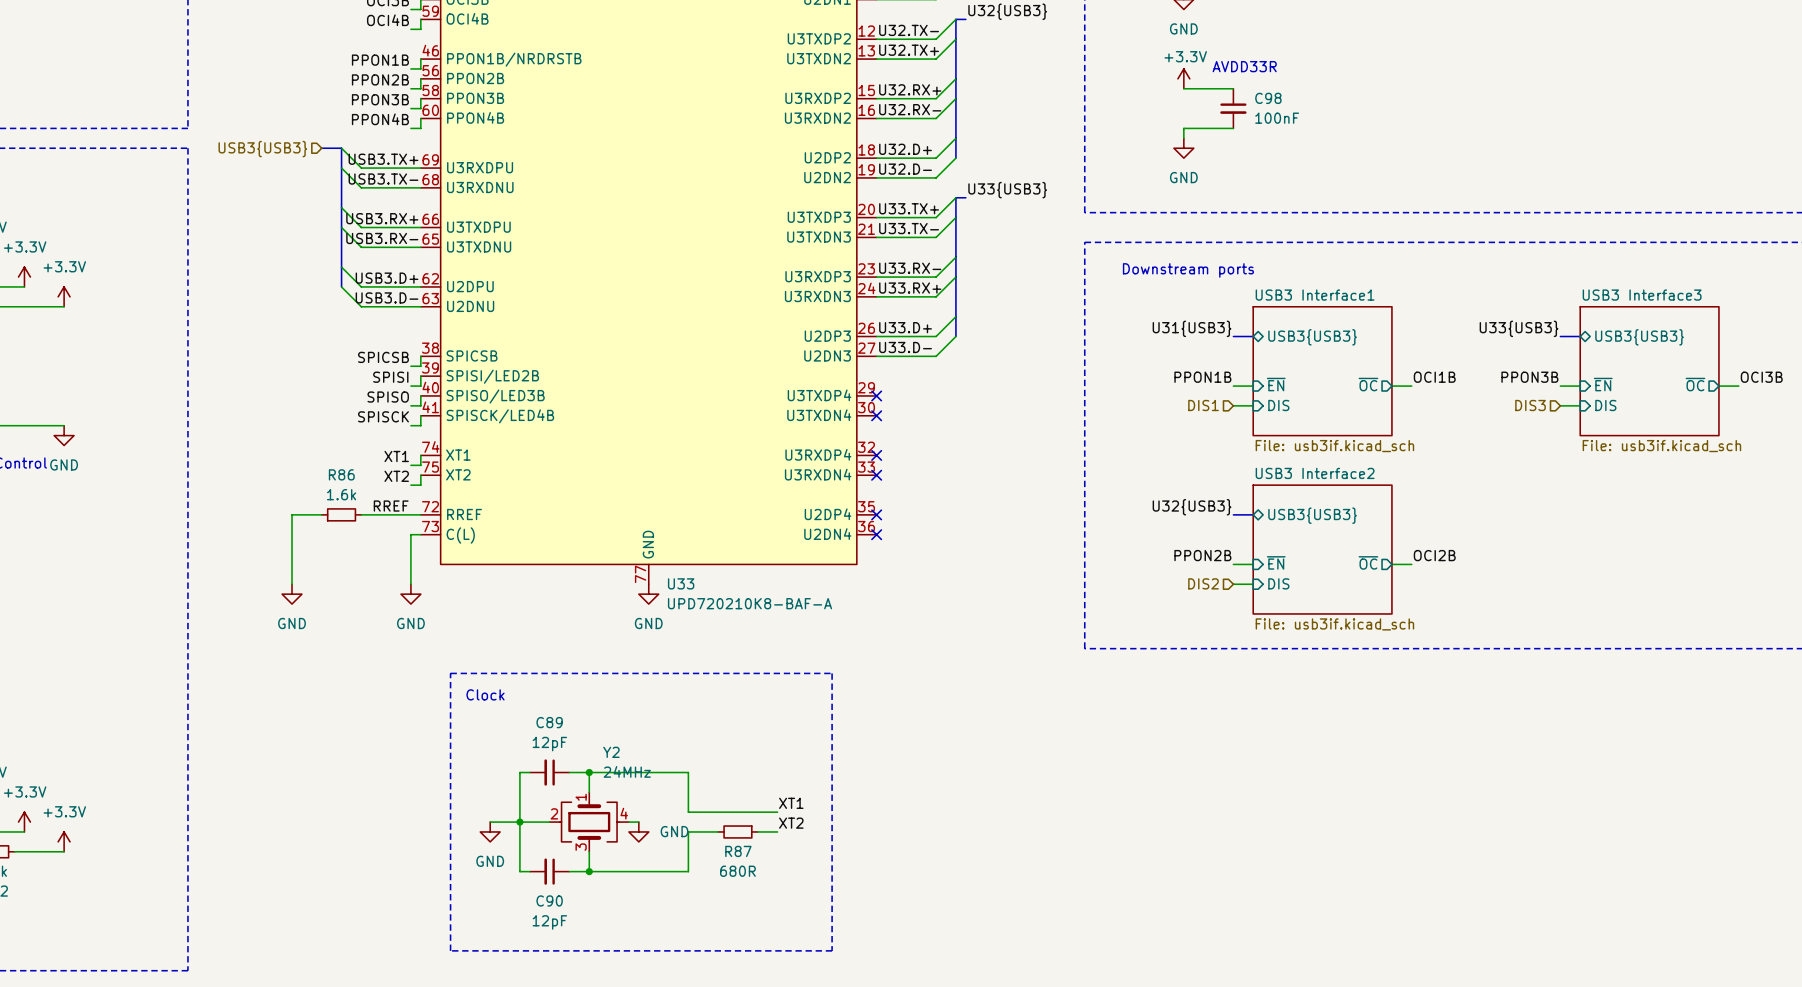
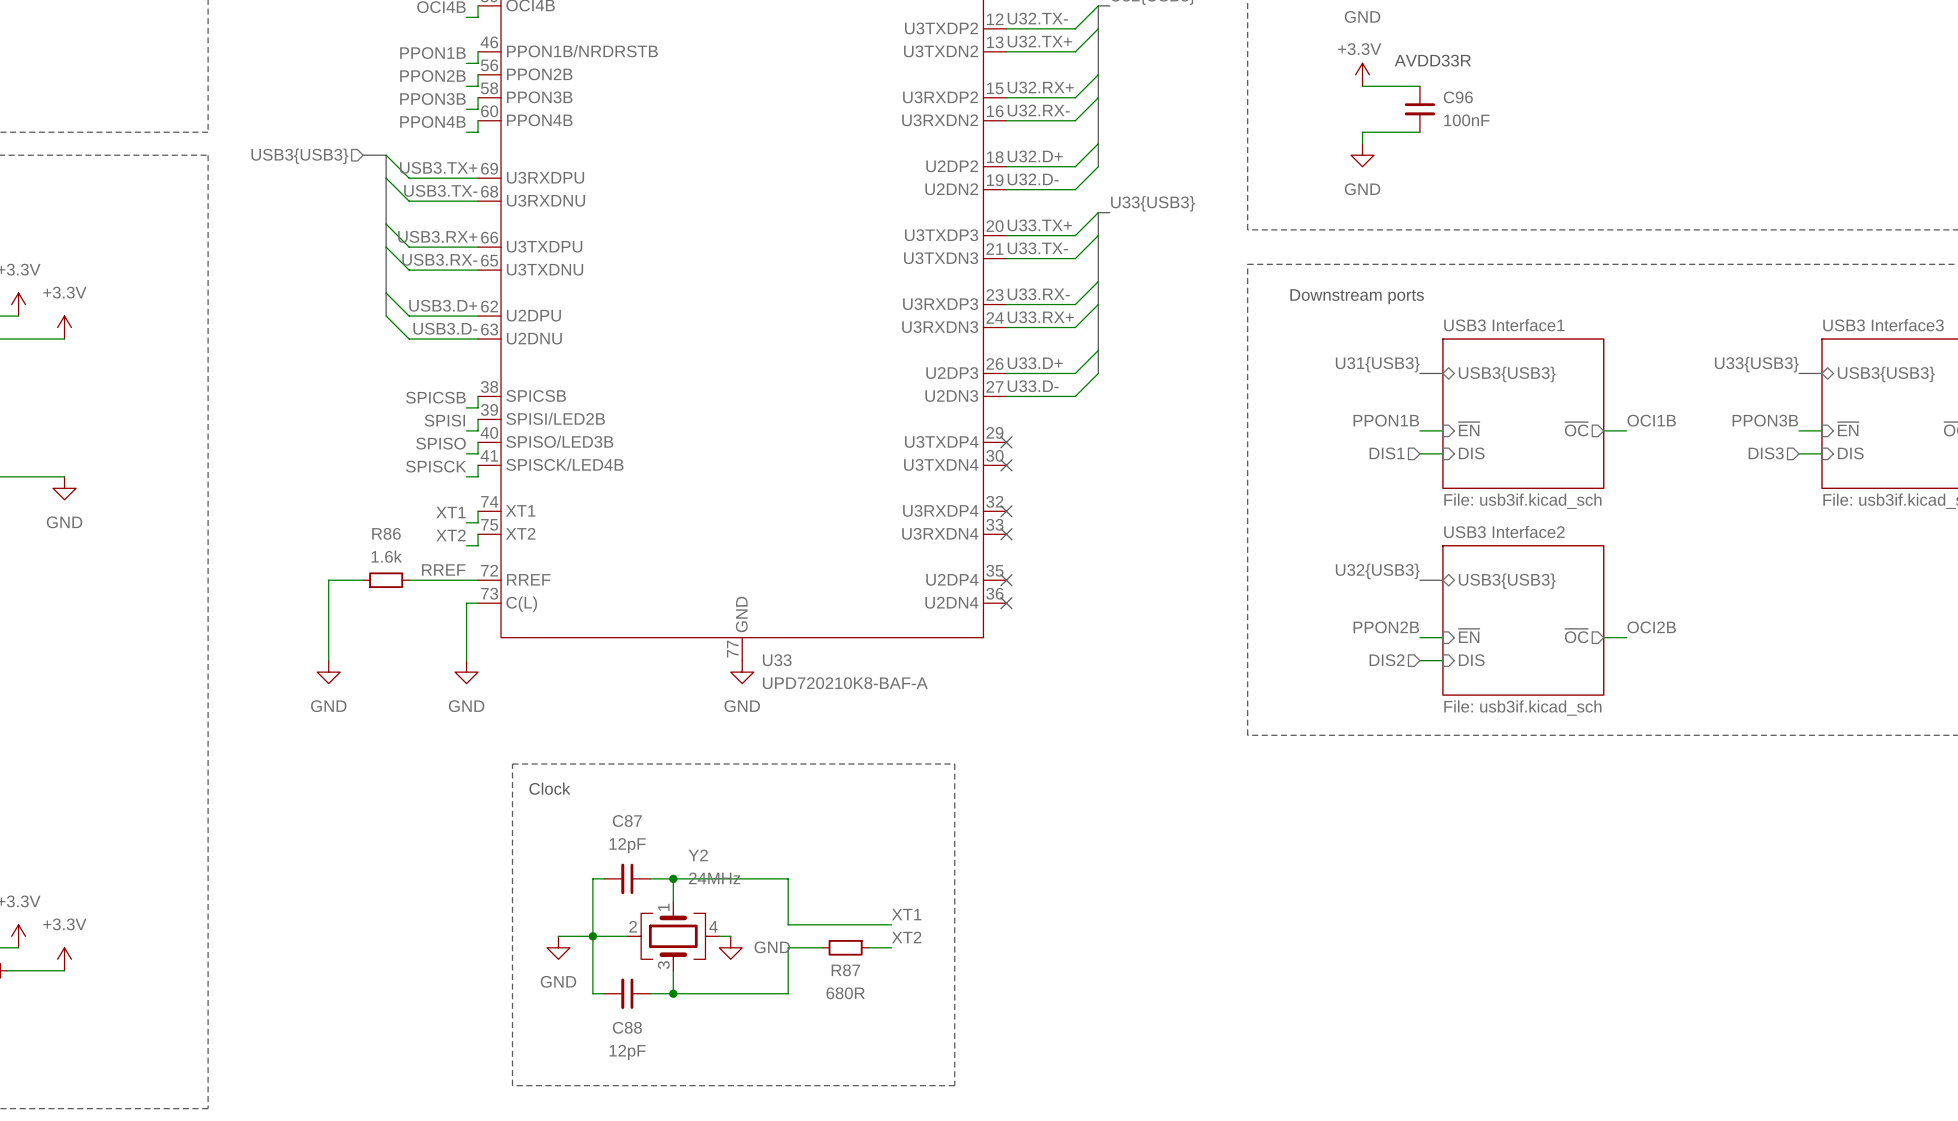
C98 name: C98 (1268, 98) -> C96 (1458, 97)
C89 name: C89 (549, 722) -> C87 (627, 821)
C90 name: C90 (549, 900) -> C88 (627, 1027)

